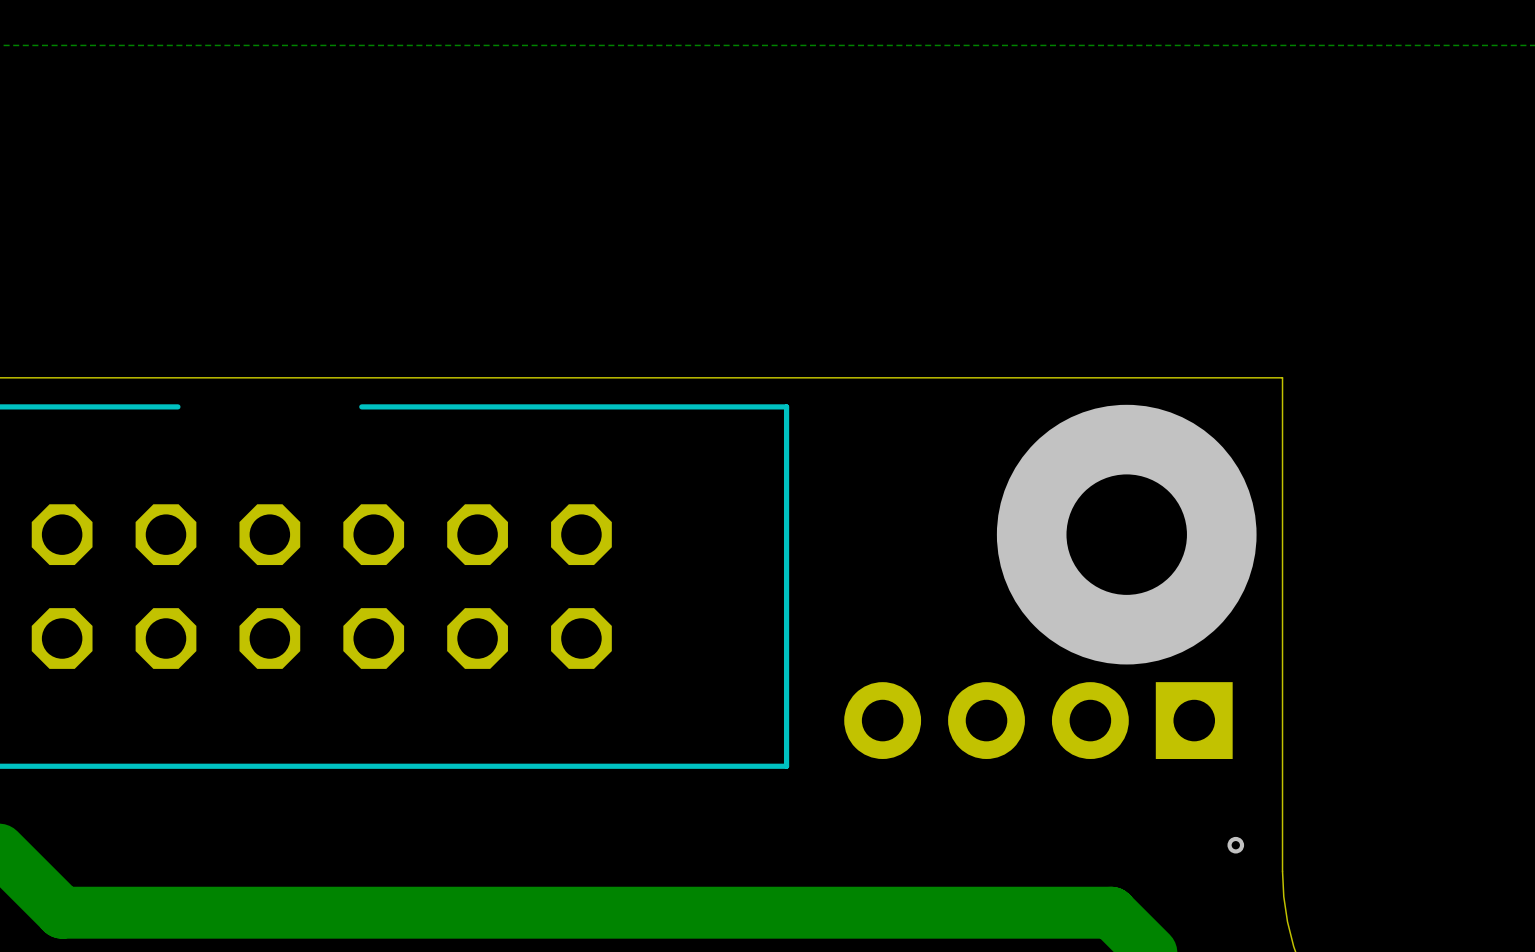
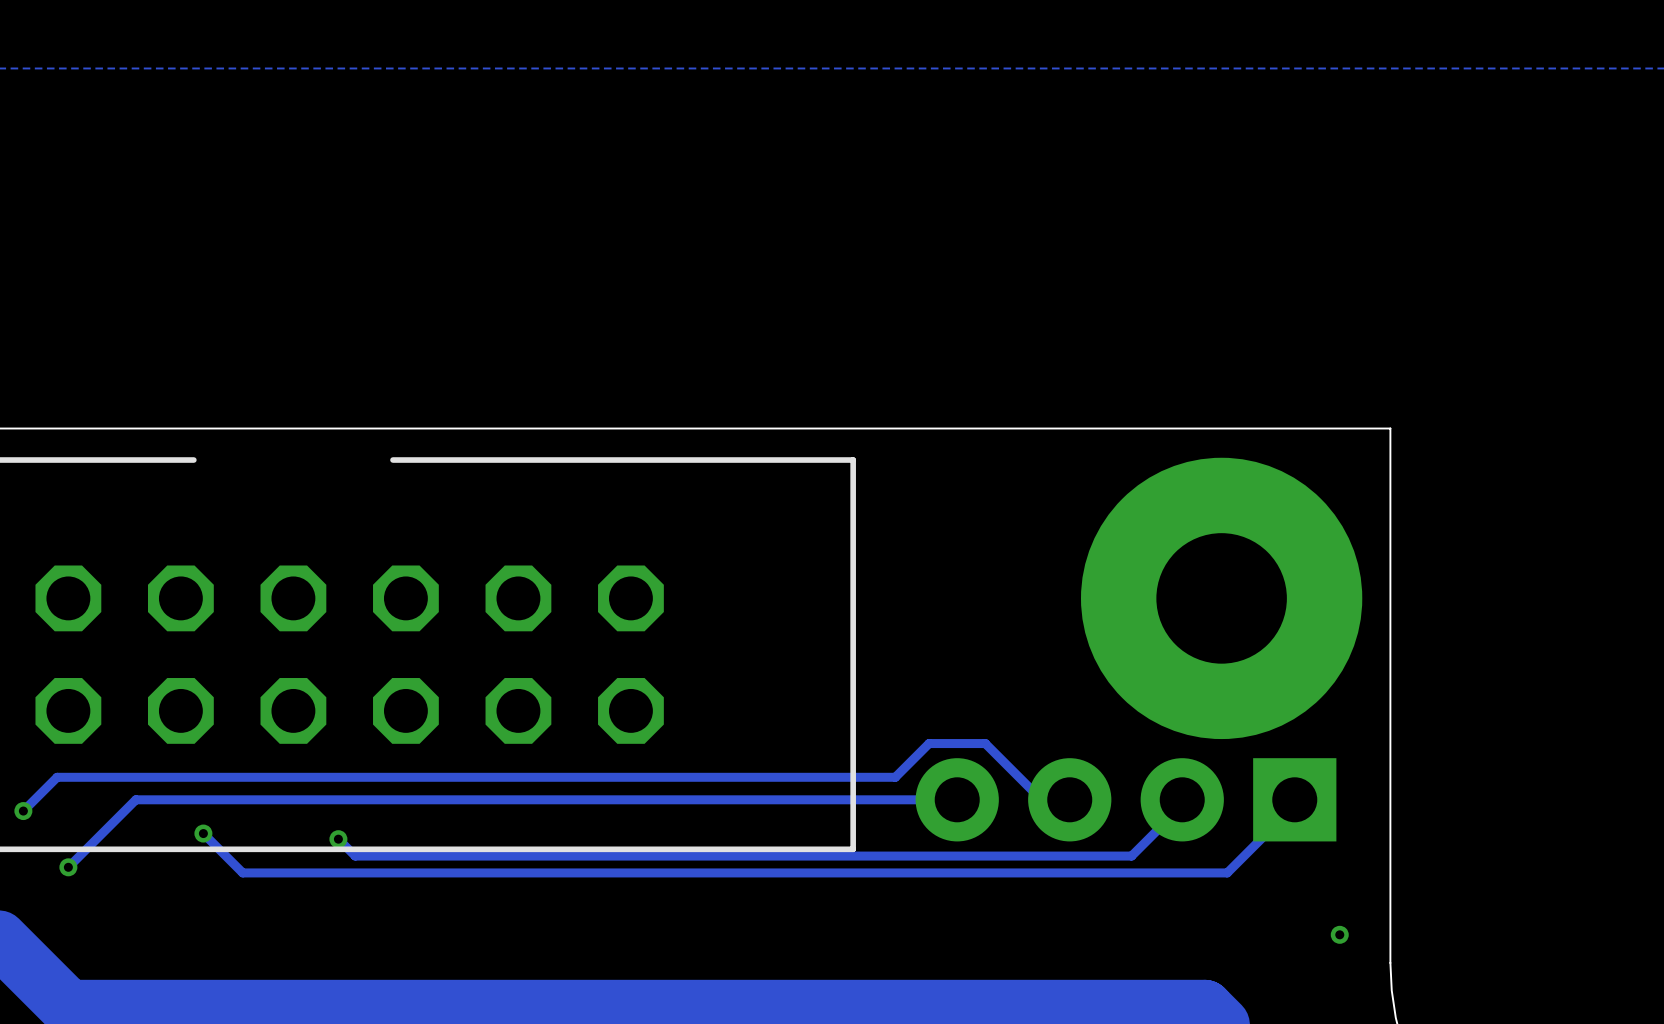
track: none -> (957, 799) (135, 799) (68, 867)
track: none -> (1069, 799) (1041, 799) (985, 743) (929, 743) (895, 777) (57, 777) (23, 811)
track: none -> (1182, 799) (1182, 805) (1131, 856) (355, 856) (338, 839)
track: none -> (1294, 799) (1294, 805) (1227, 872) (242, 872) (203, 833)
via: none -> (23, 811)
via: none -> (203, 833)
via: none -> (338, 839)
via: none -> (68, 867)

